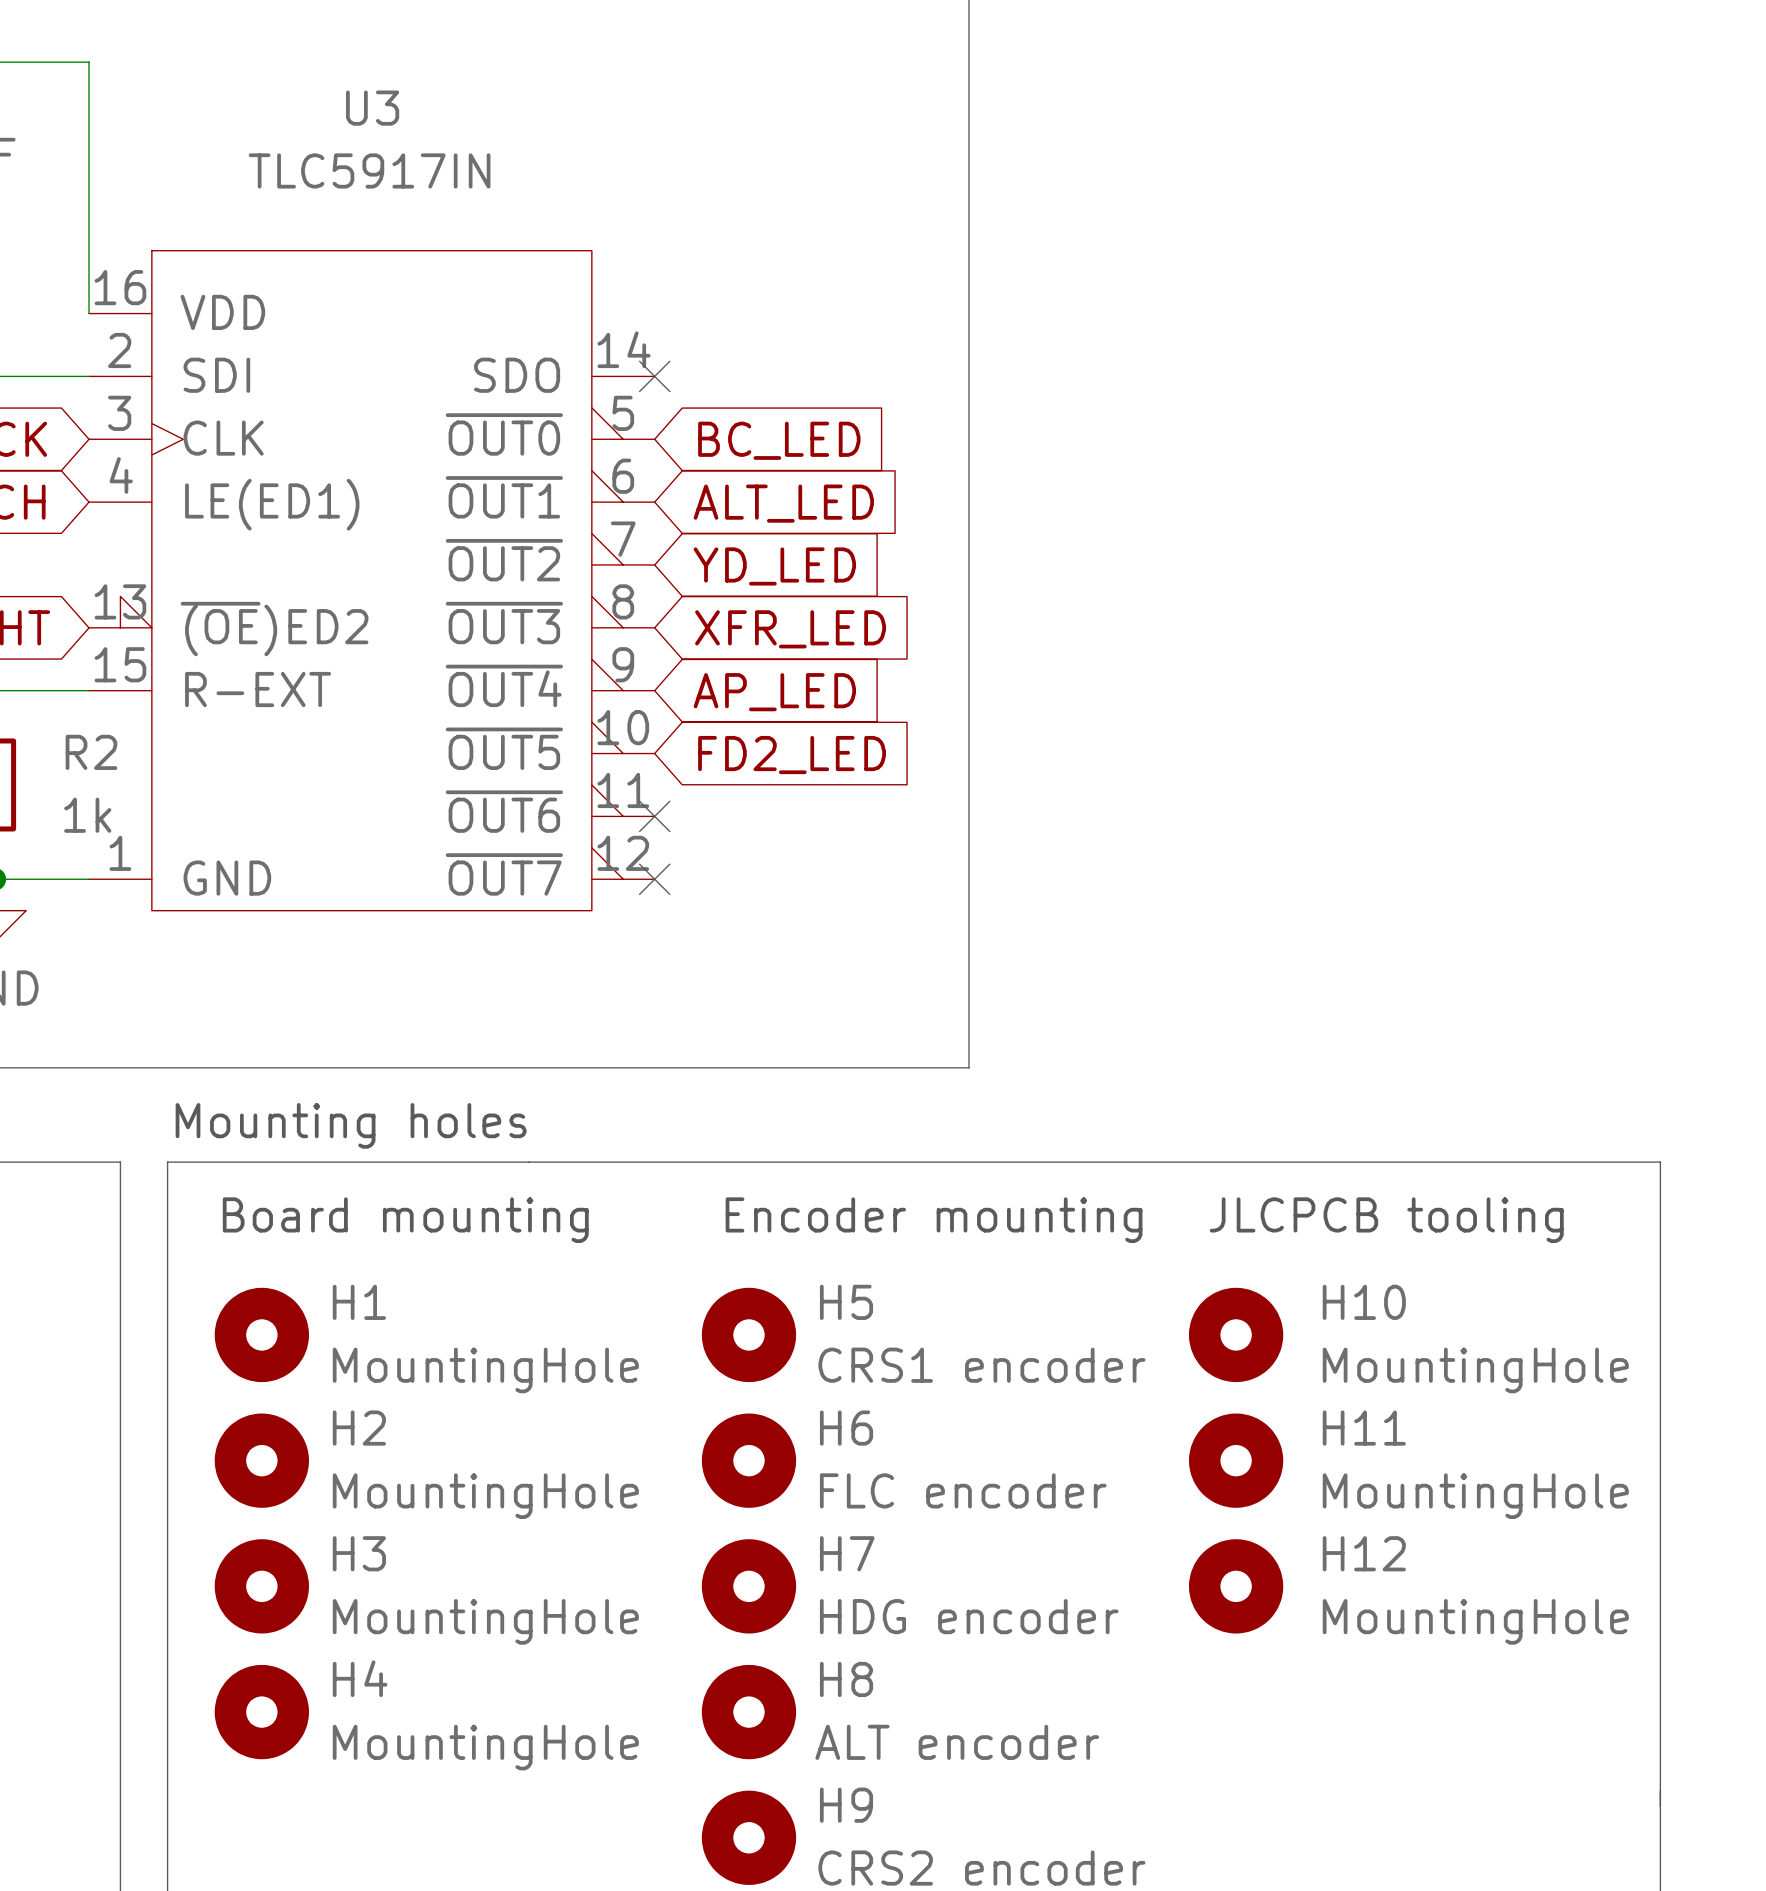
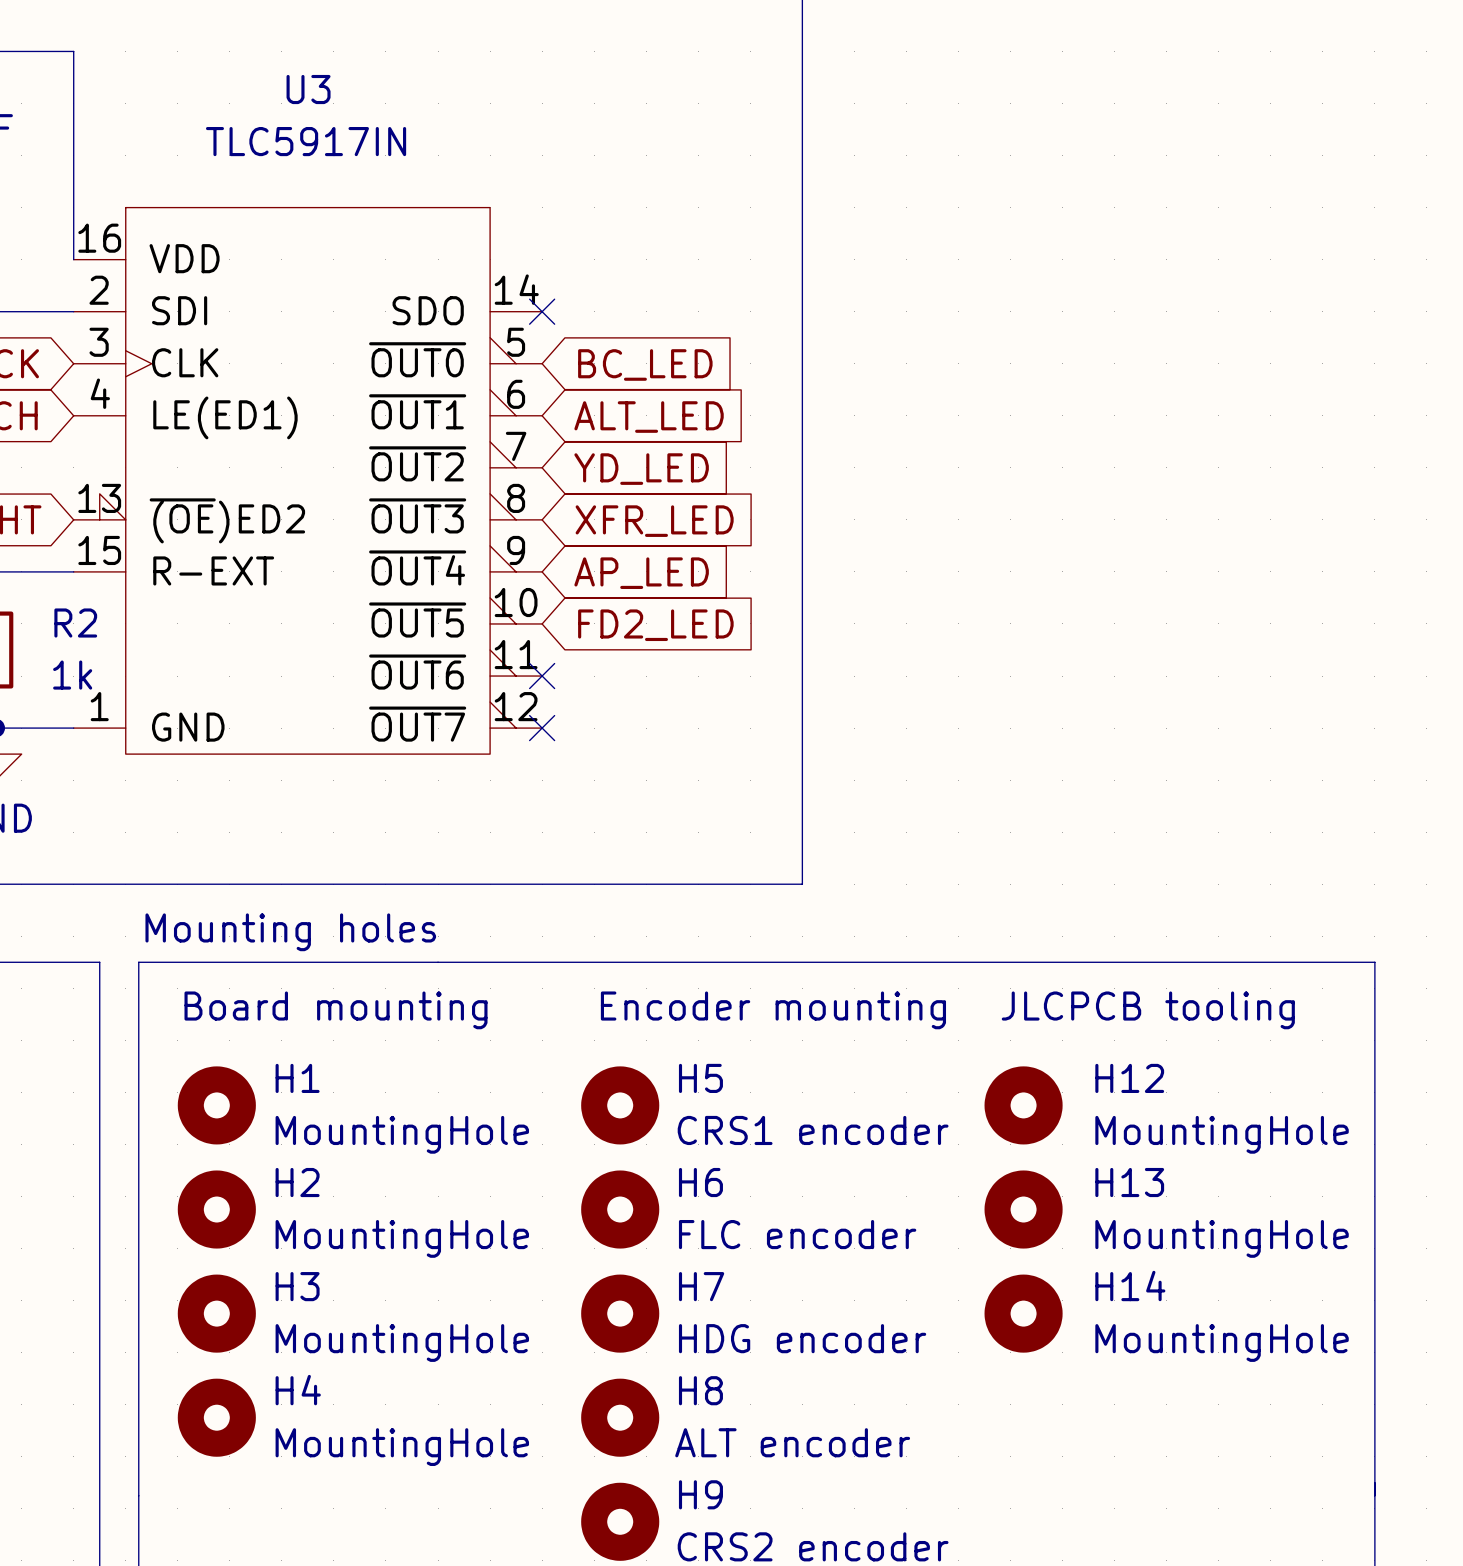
H10 name: H10 (1364, 1302) -> H12 (1129, 1078)
H11 name: H11 (1364, 1428) -> H13 (1129, 1182)
H12 name: H12 (1364, 1553) -> H14 (1130, 1285)

